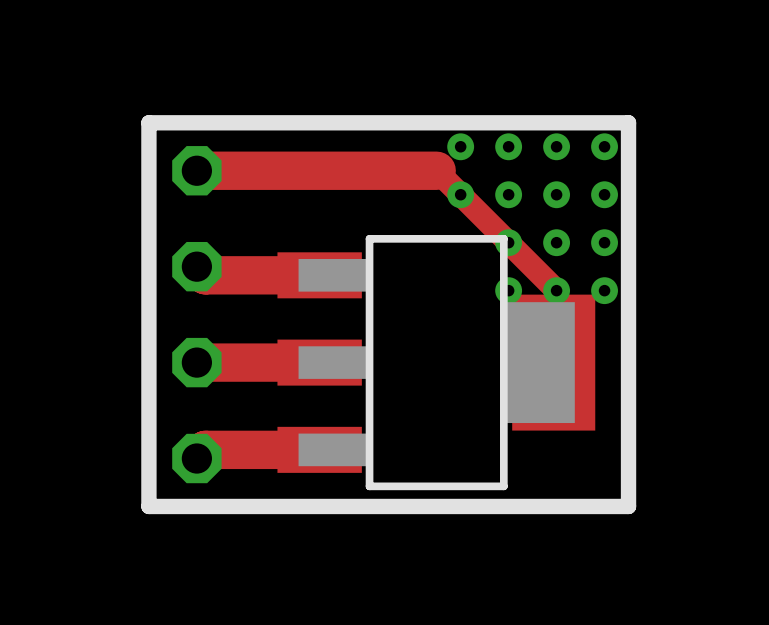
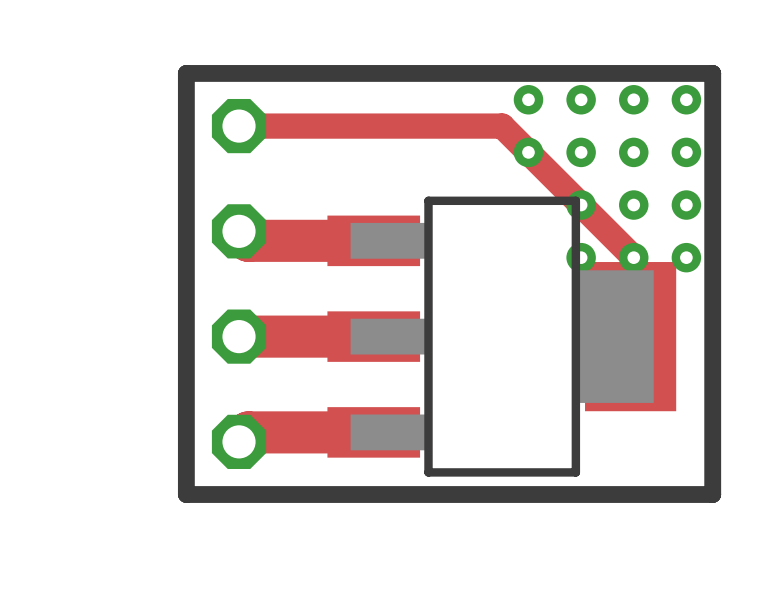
track width: thick (196, 170) (436, 170) -> thin (239, 126) (502, 126)

